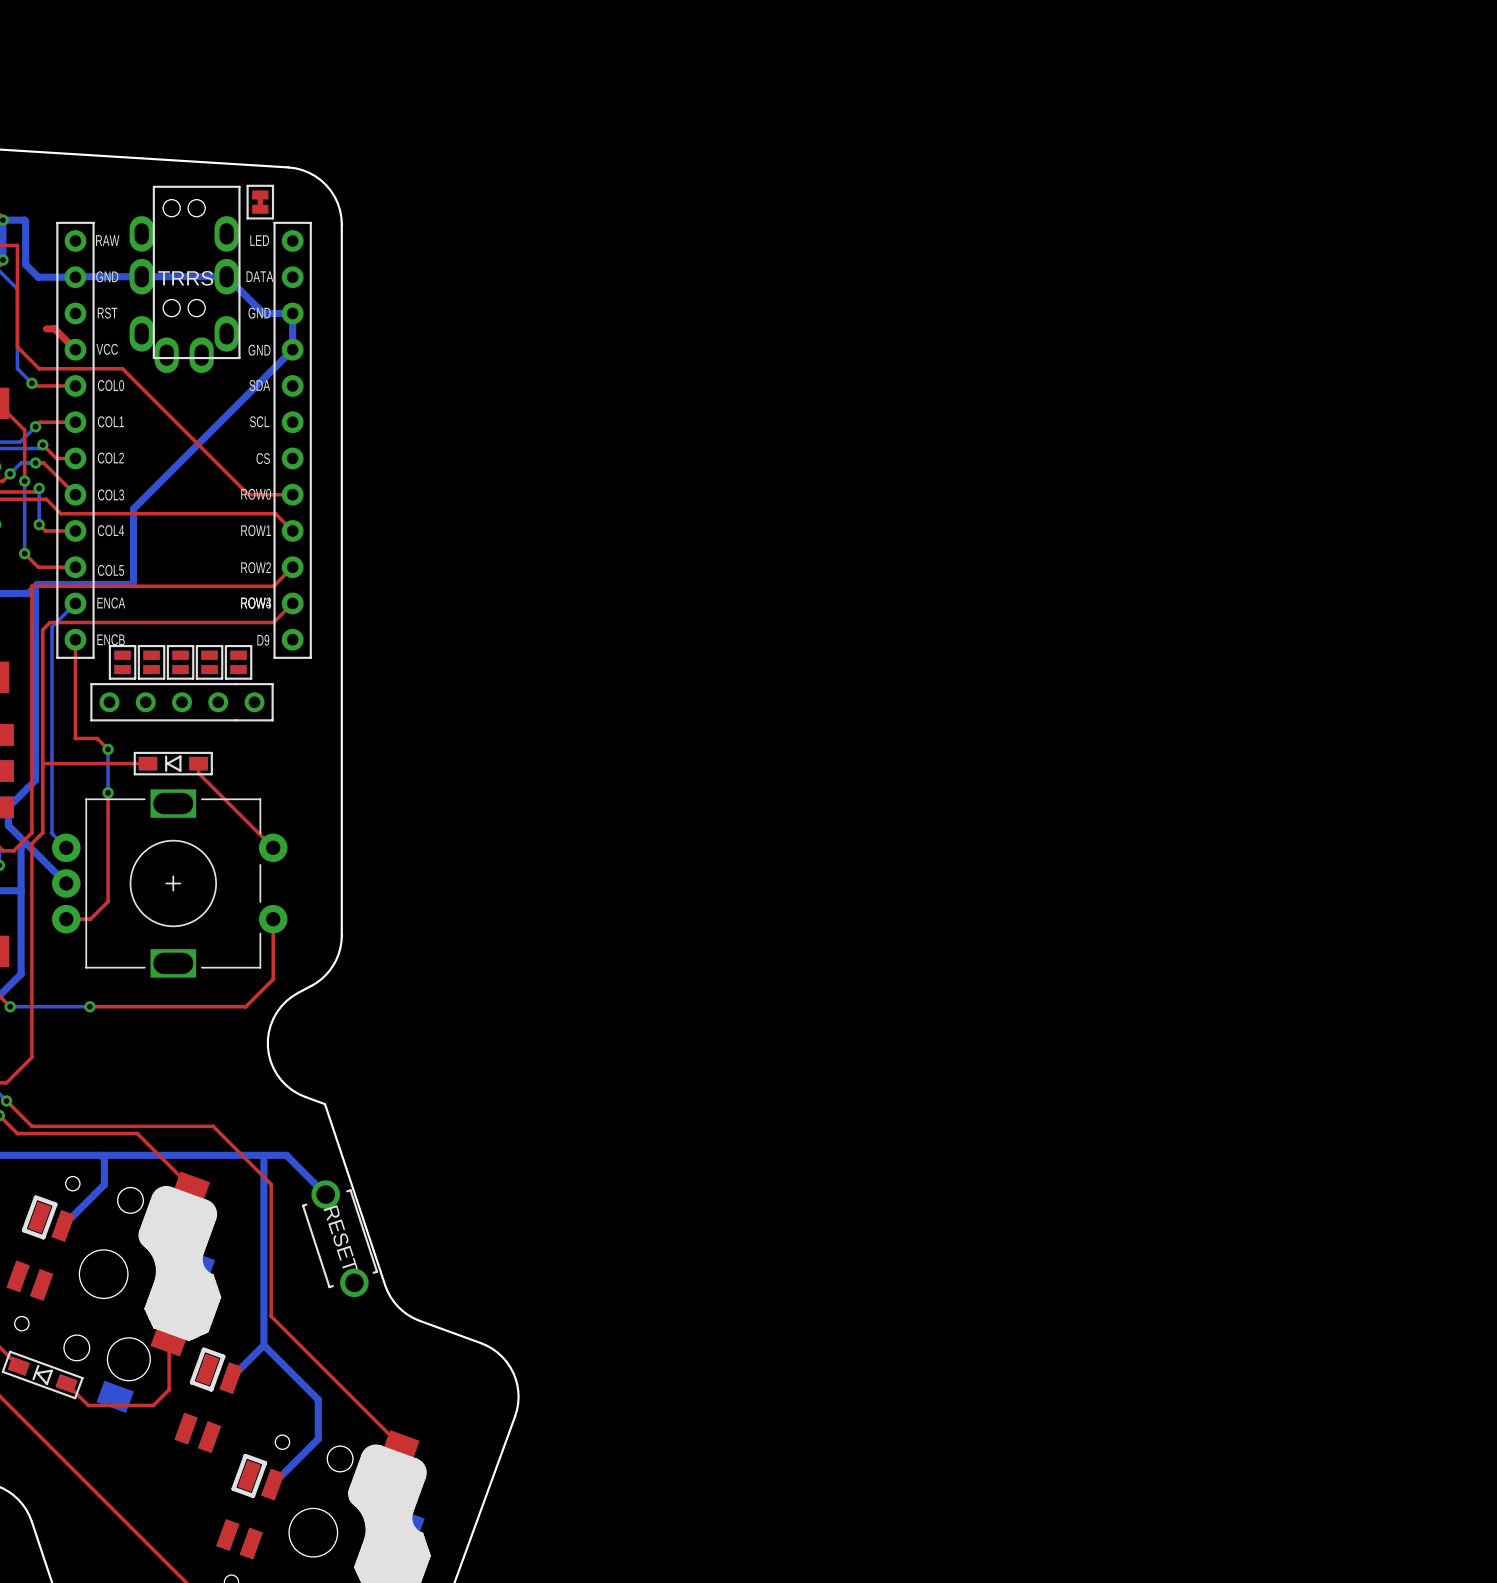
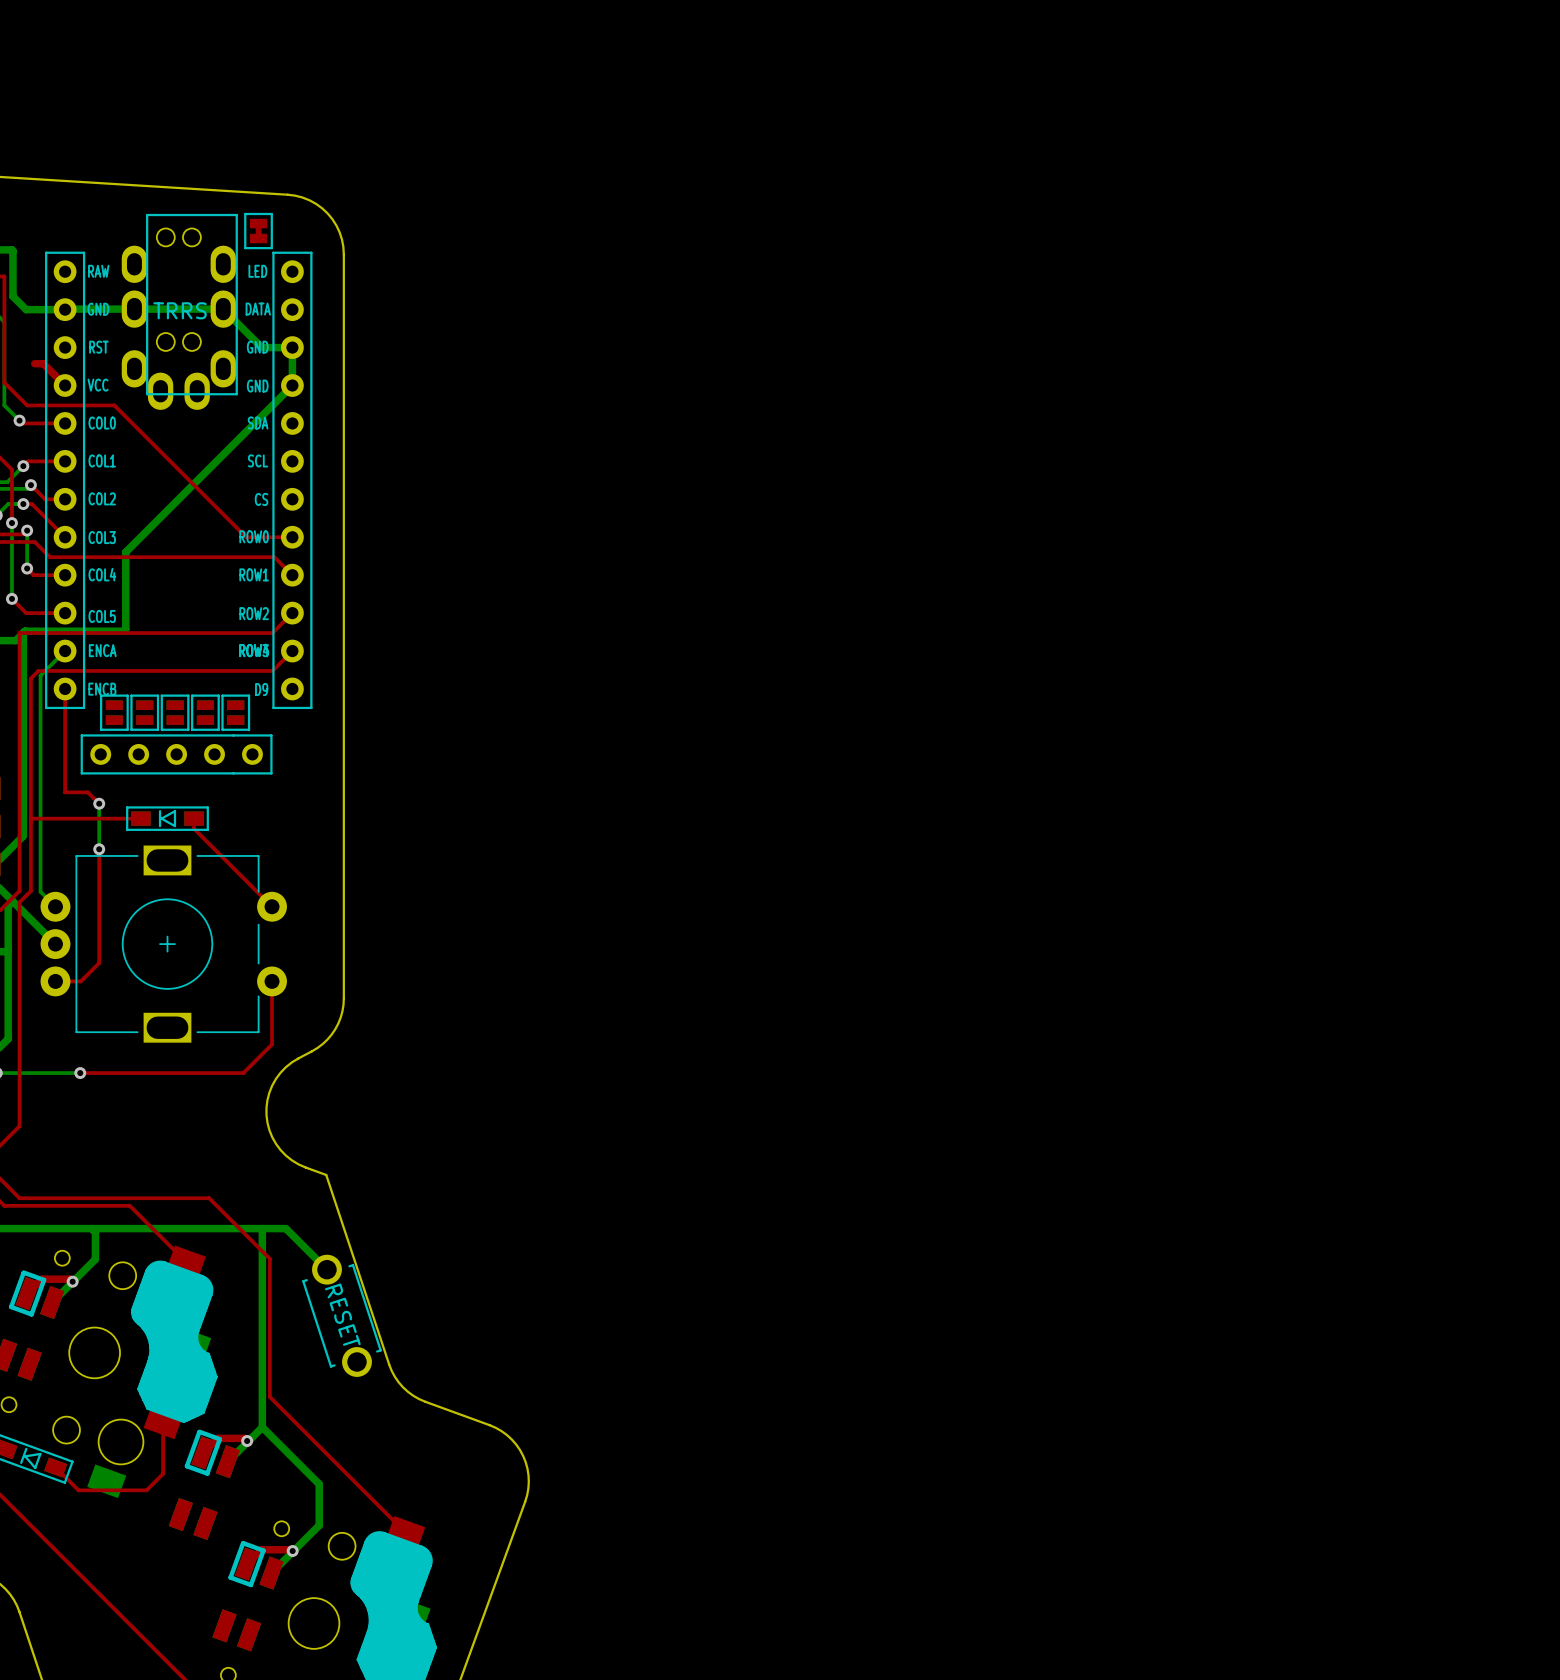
top track: none -> (72, 1281) (70, 1279) (41, 1279) (27, 1293)
via: none -> (72, 1281)
top track: none -> (247, 1441) (244, 1438) (217, 1438) (203, 1452)
via: none -> (247, 1441)
top track: none -> (292, 1551) (261, 1549) (247, 1564)
via: none -> (292, 1551)

